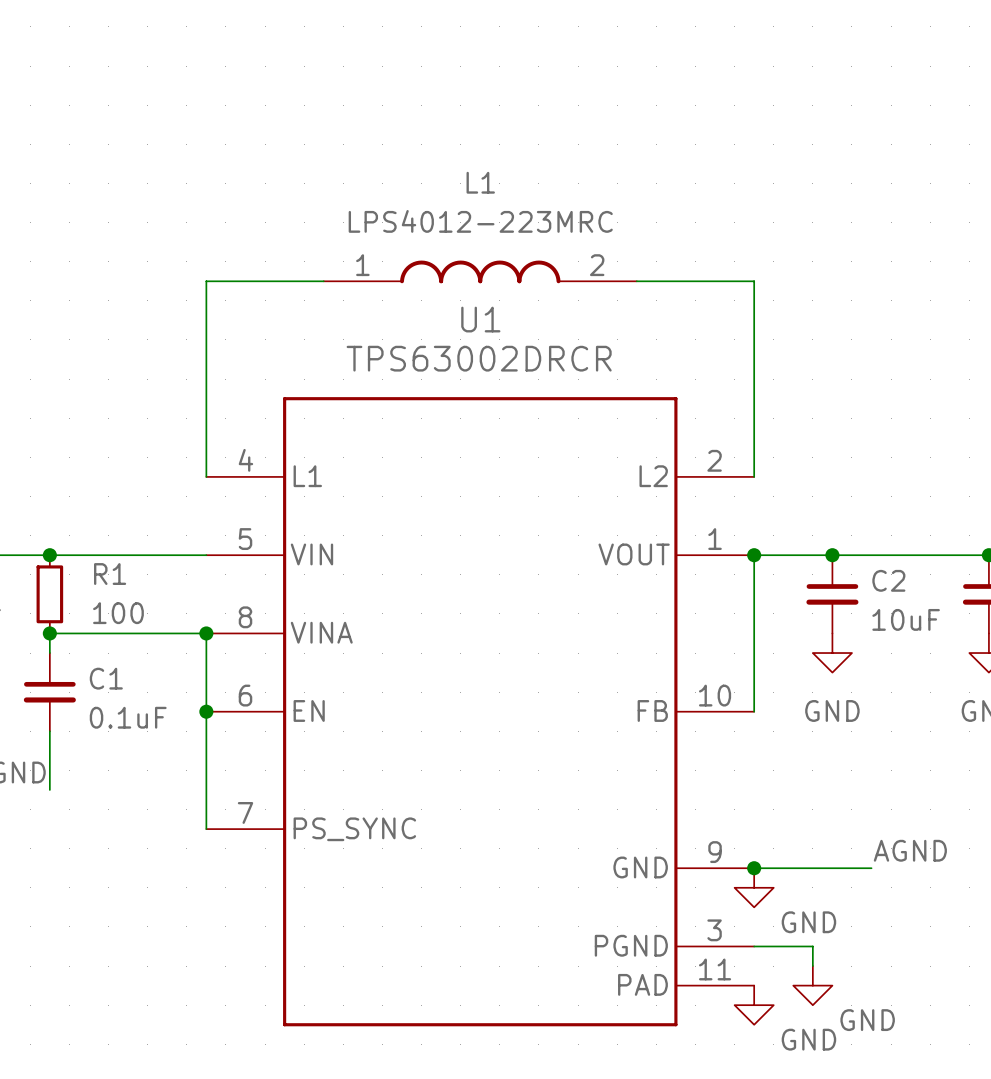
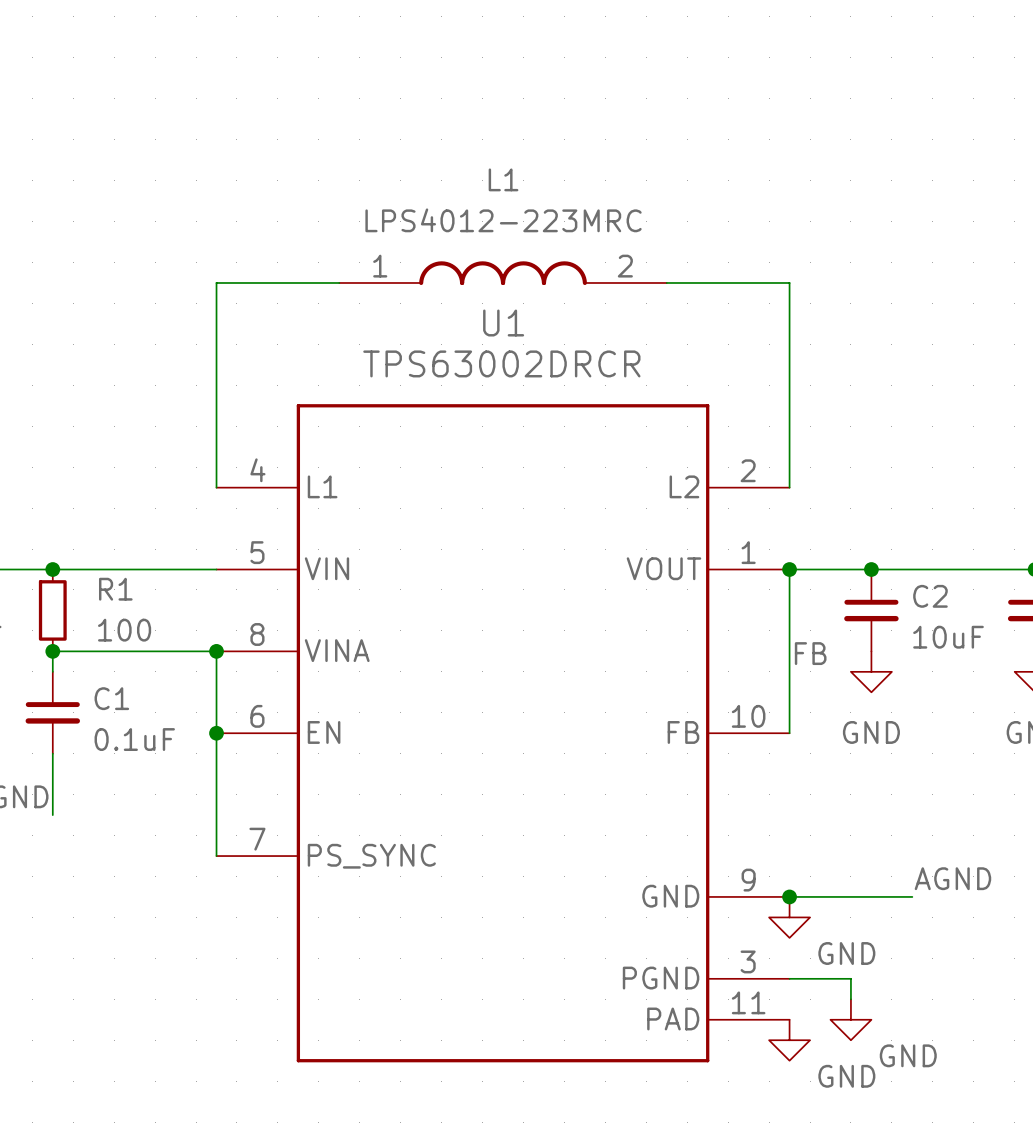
label: none -> FB (810, 653)

